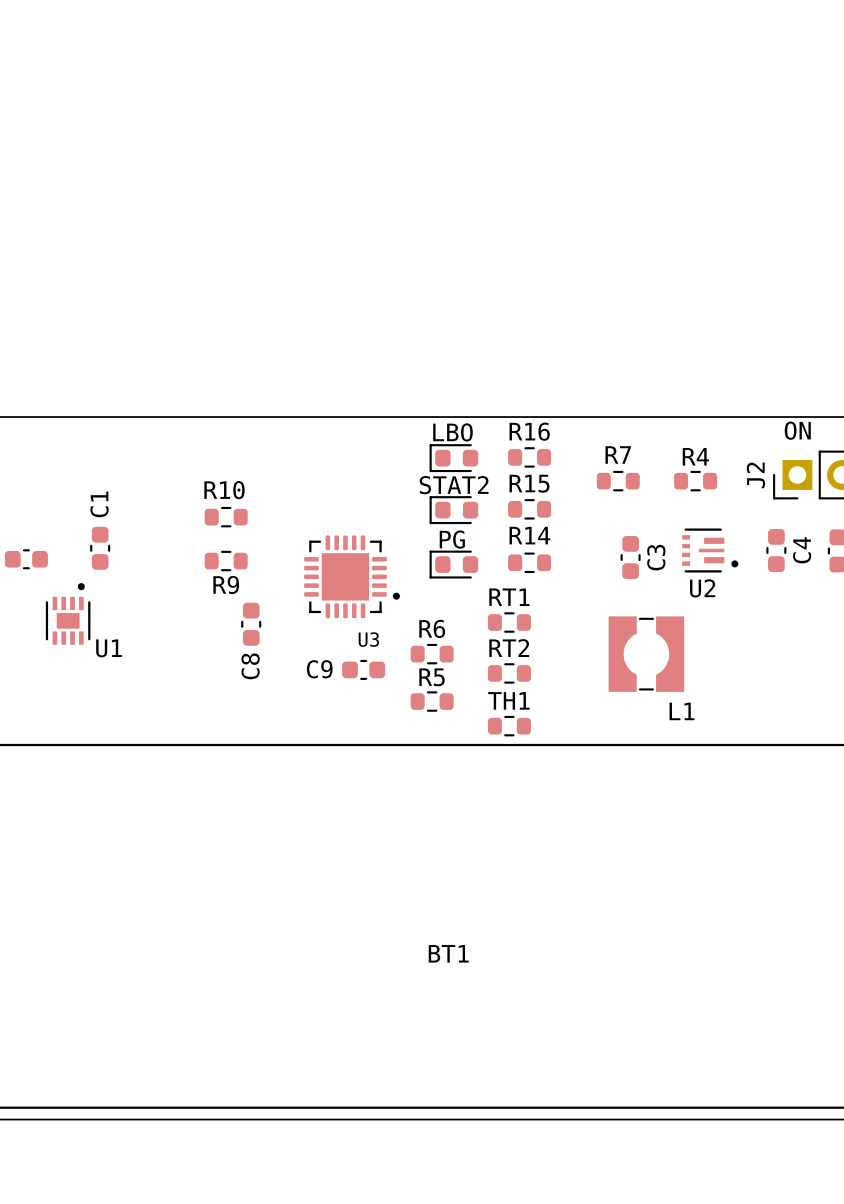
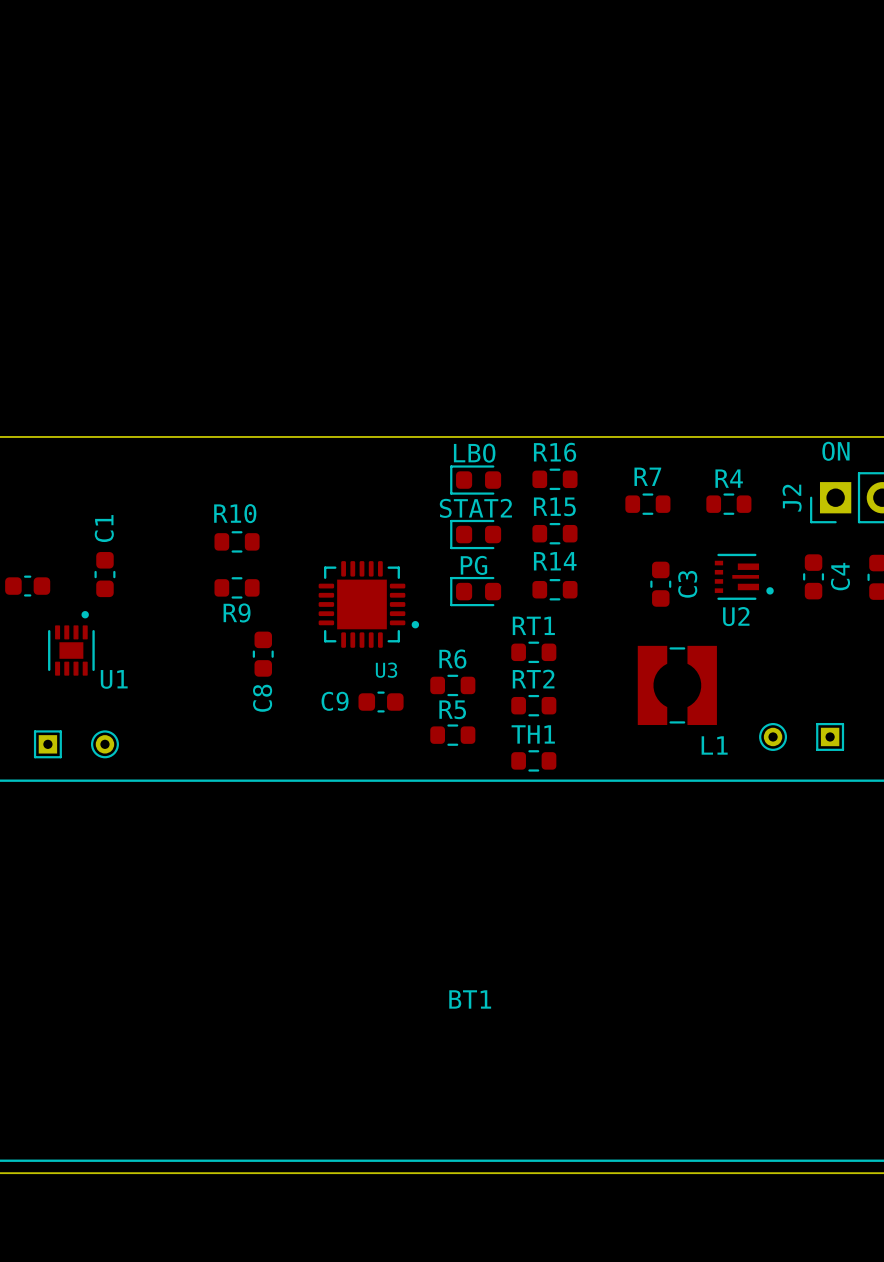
part: none -> (773, 736)
part: none -> (830, 736)
part: none -> (47, 744)
part: none -> (104, 744)

